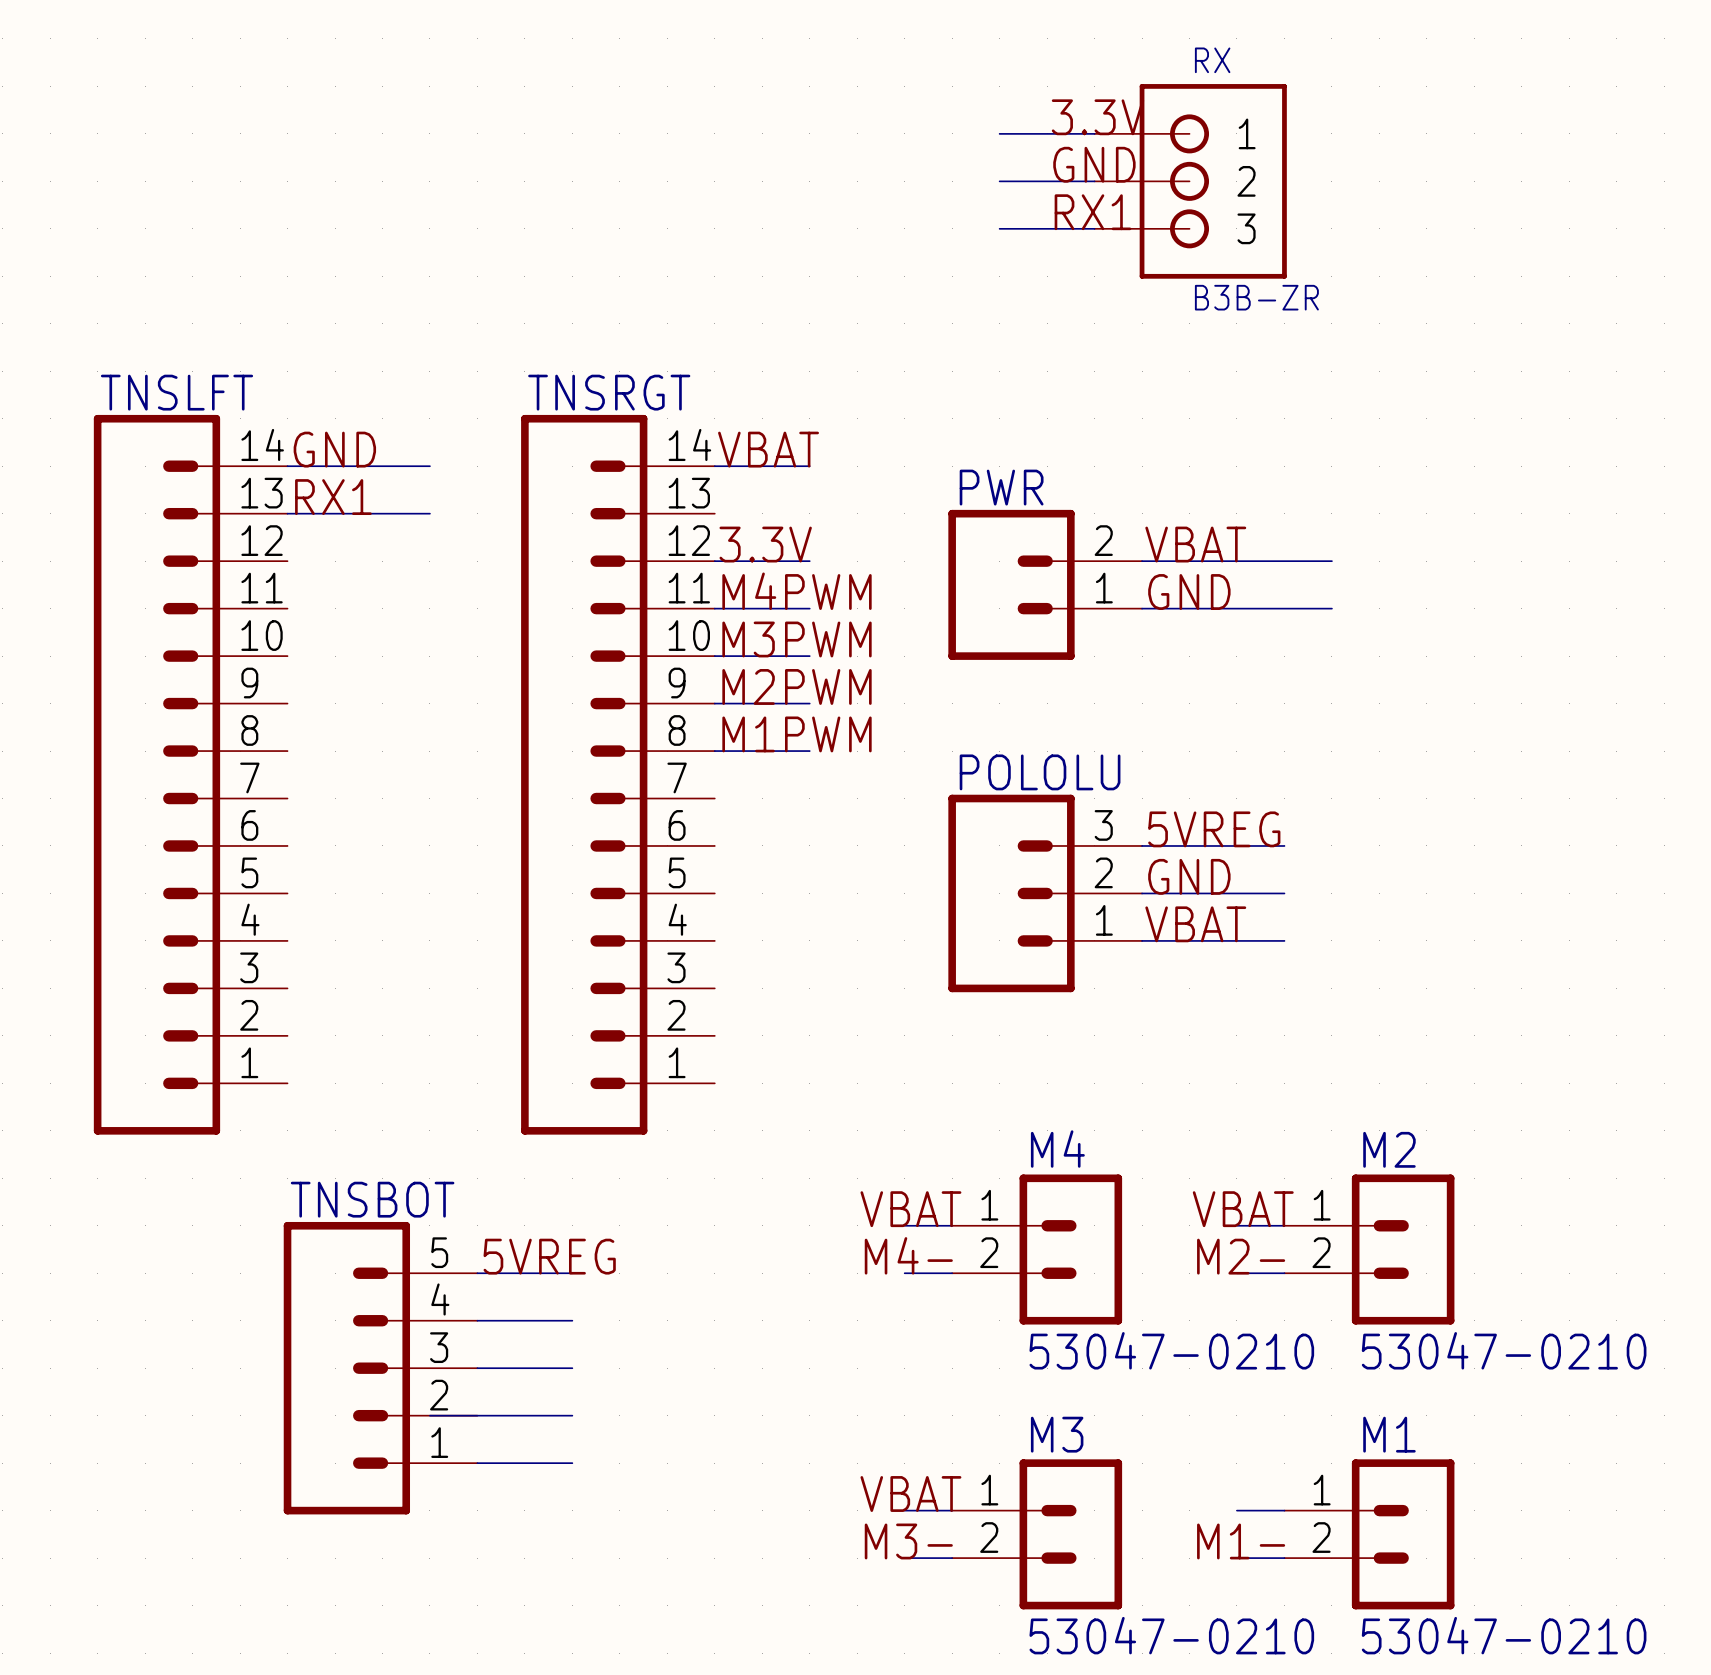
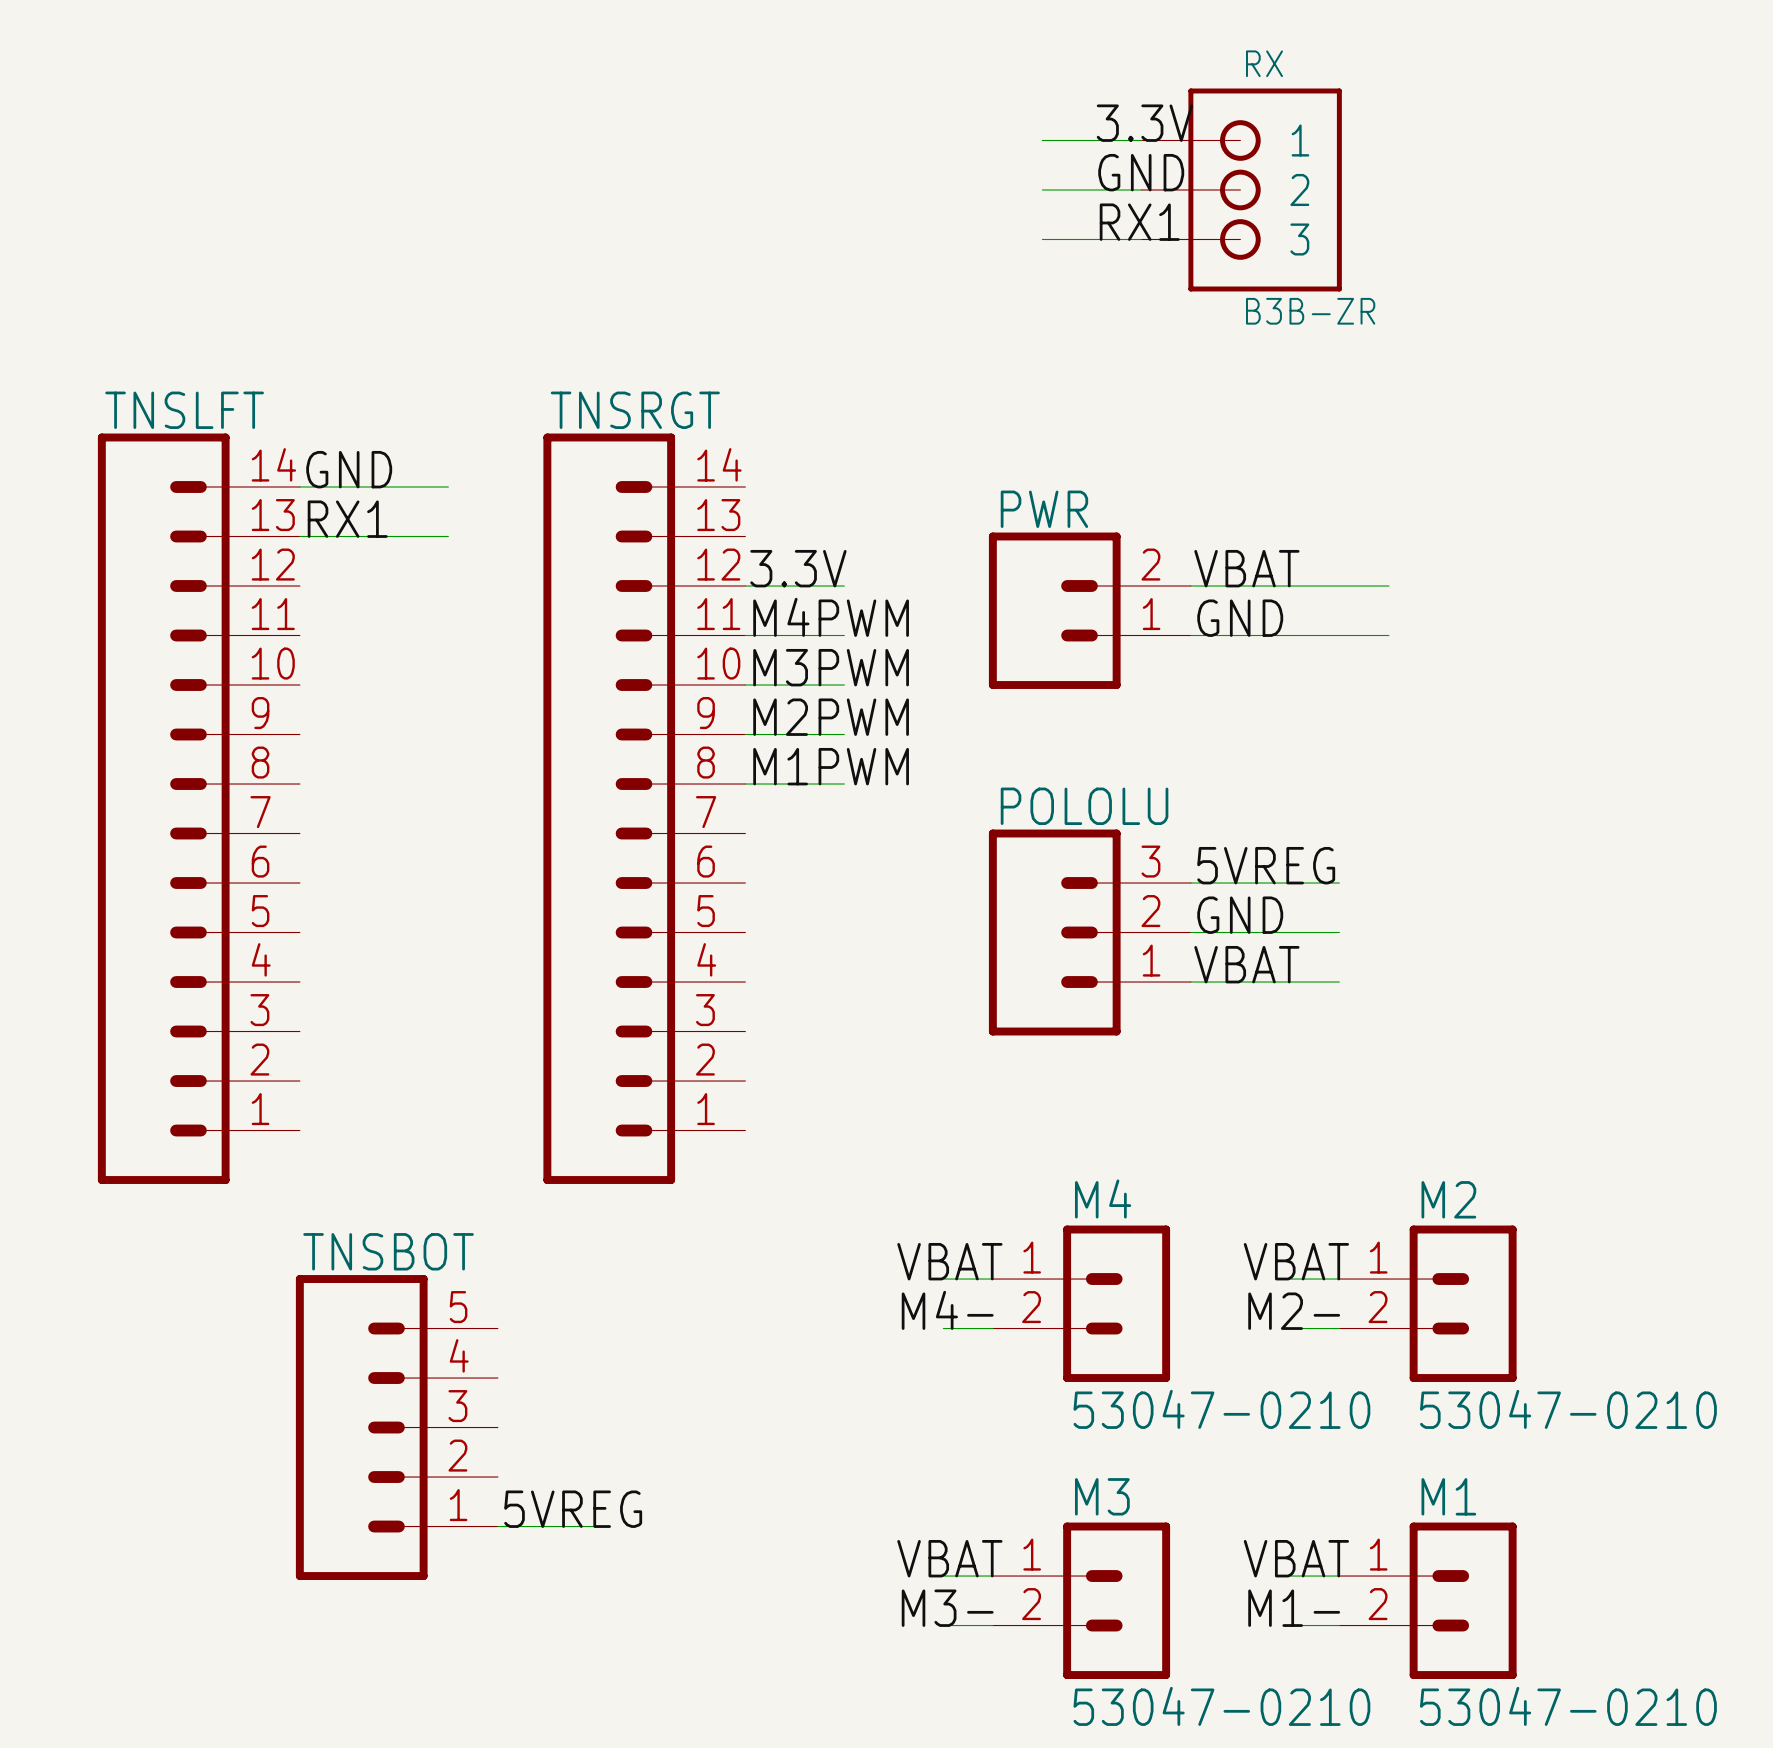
label: VBAT (768, 449) -> none
wire: (714, 466) (809, 466) -> none
label position: 5VREG (549, 1256) -> 5VREG (573, 1509)
wire: (477, 1273) (572, 1273) -> none
wire: (477, 1320) (572, 1320) -> none
wire: (477, 1368) (572, 1368) -> none
wire: (429, 1415) (572, 1415) -> none
label: none -> VBAT (1296, 1558)

